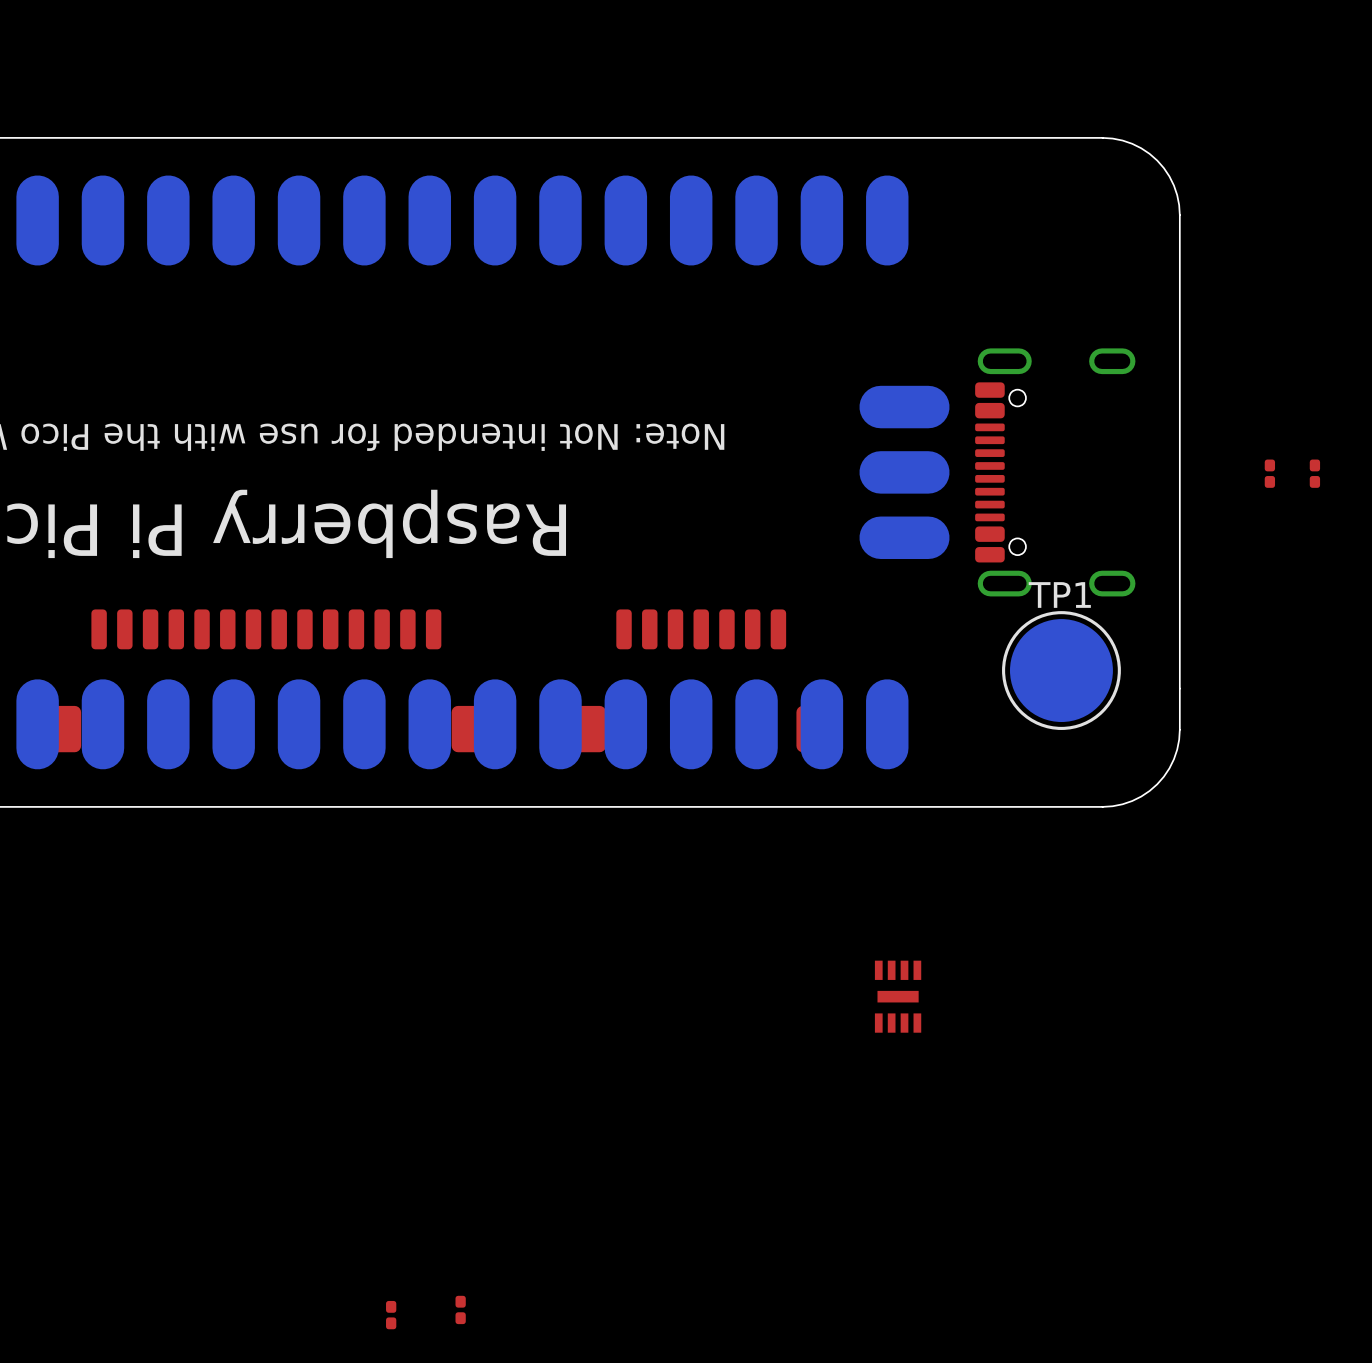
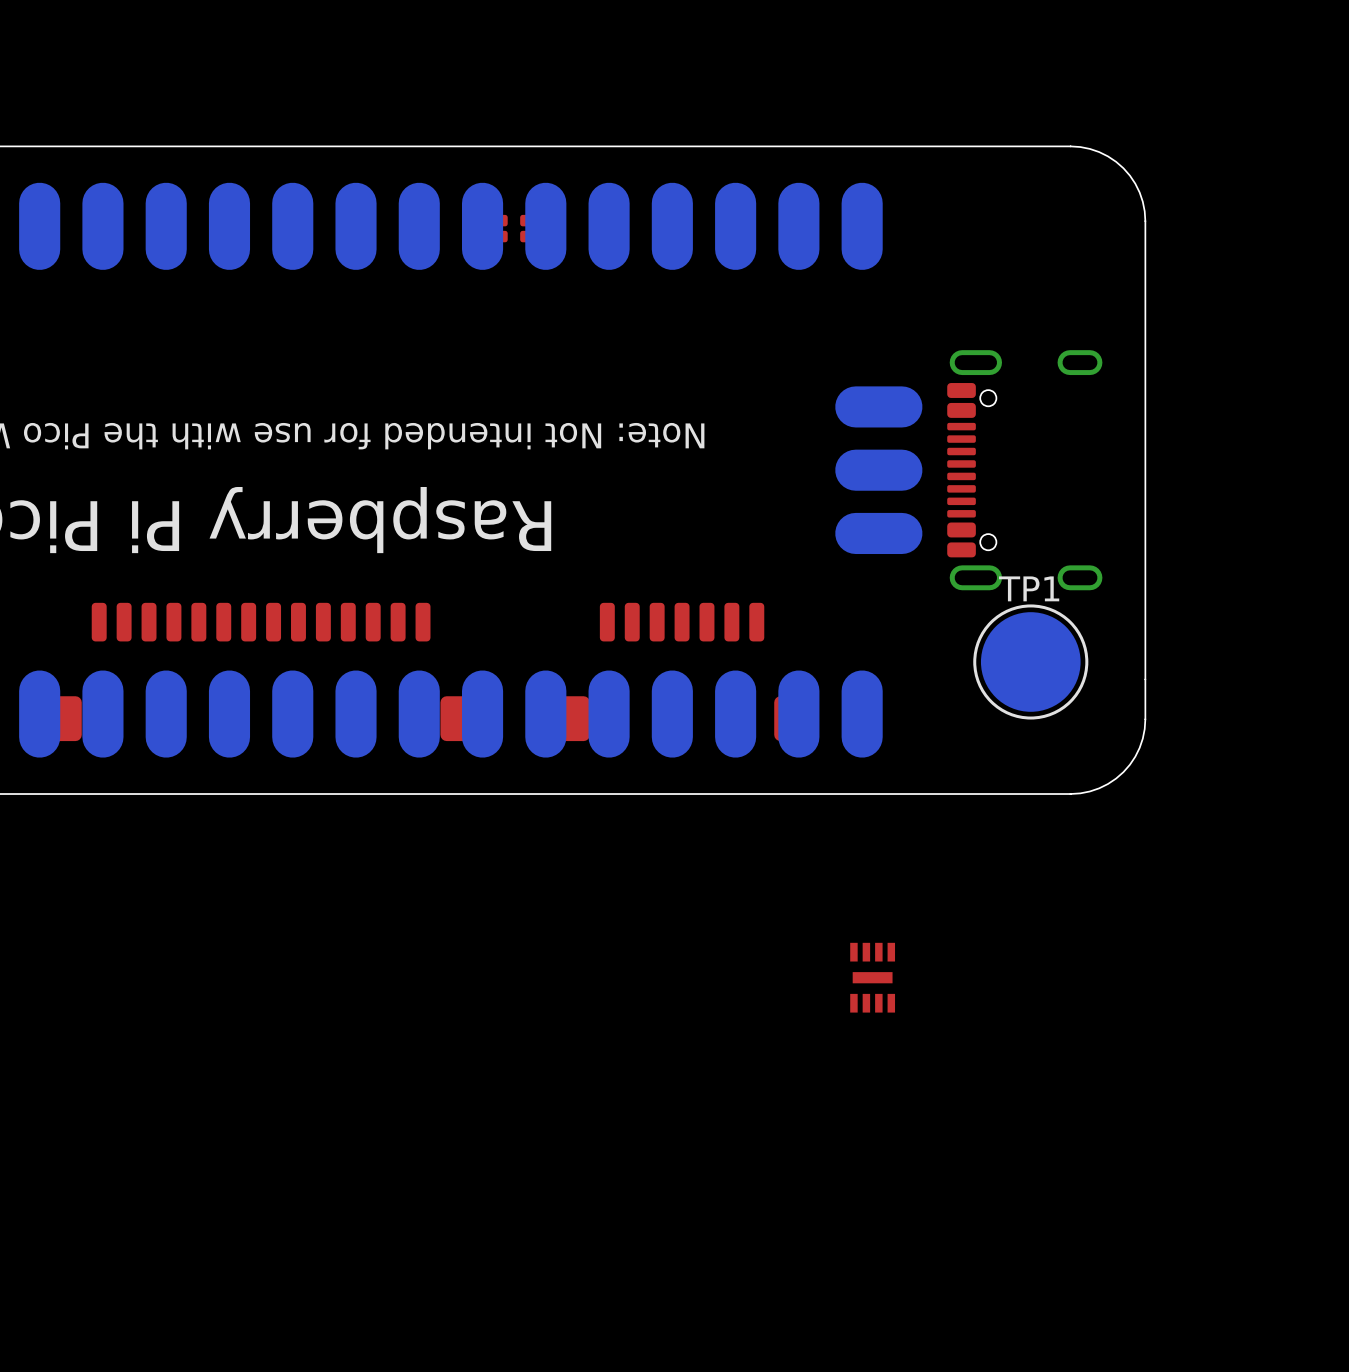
part: none -> (502, 228)
part: none -> (525, 228)
part: (1269, 473) -> none
part: (1314, 473) -> none
part: (460, 1309) -> none
part: (391, 1315) -> none

